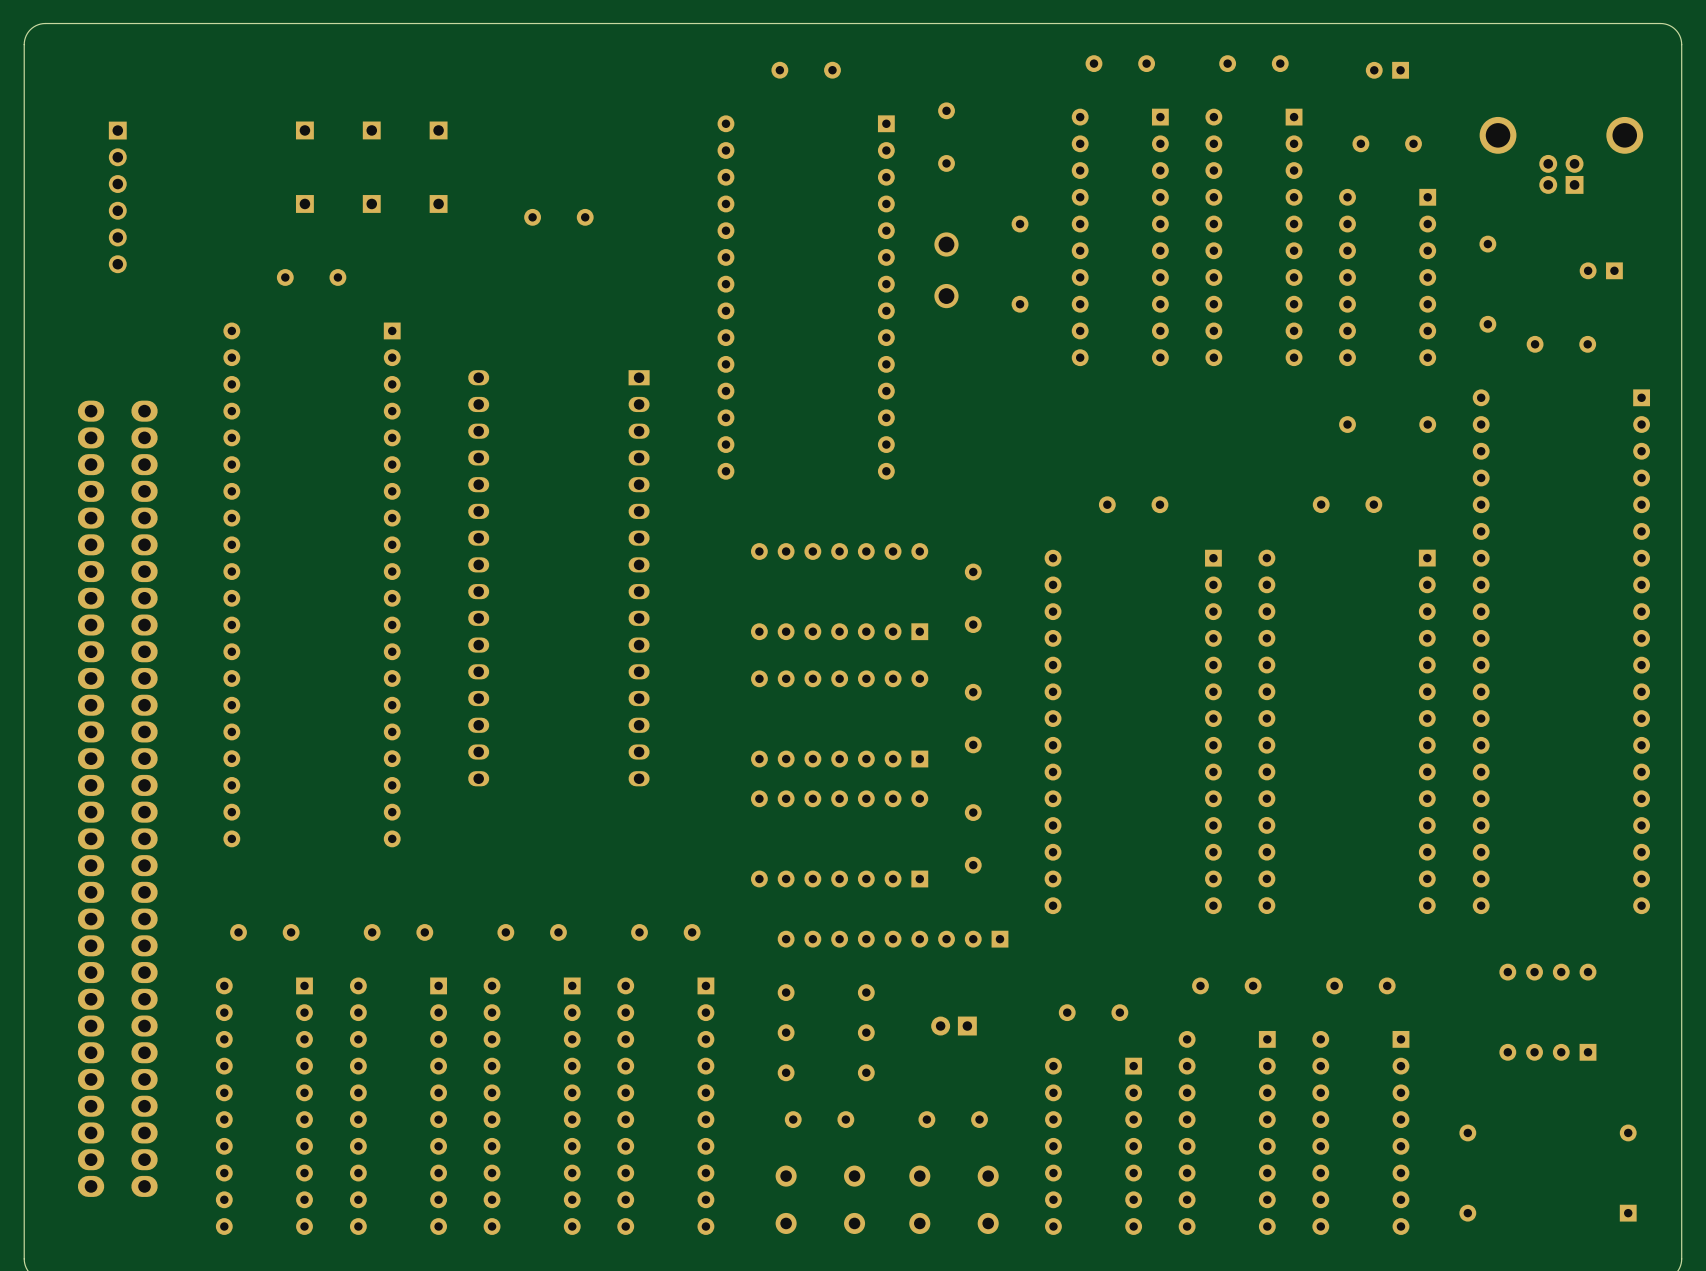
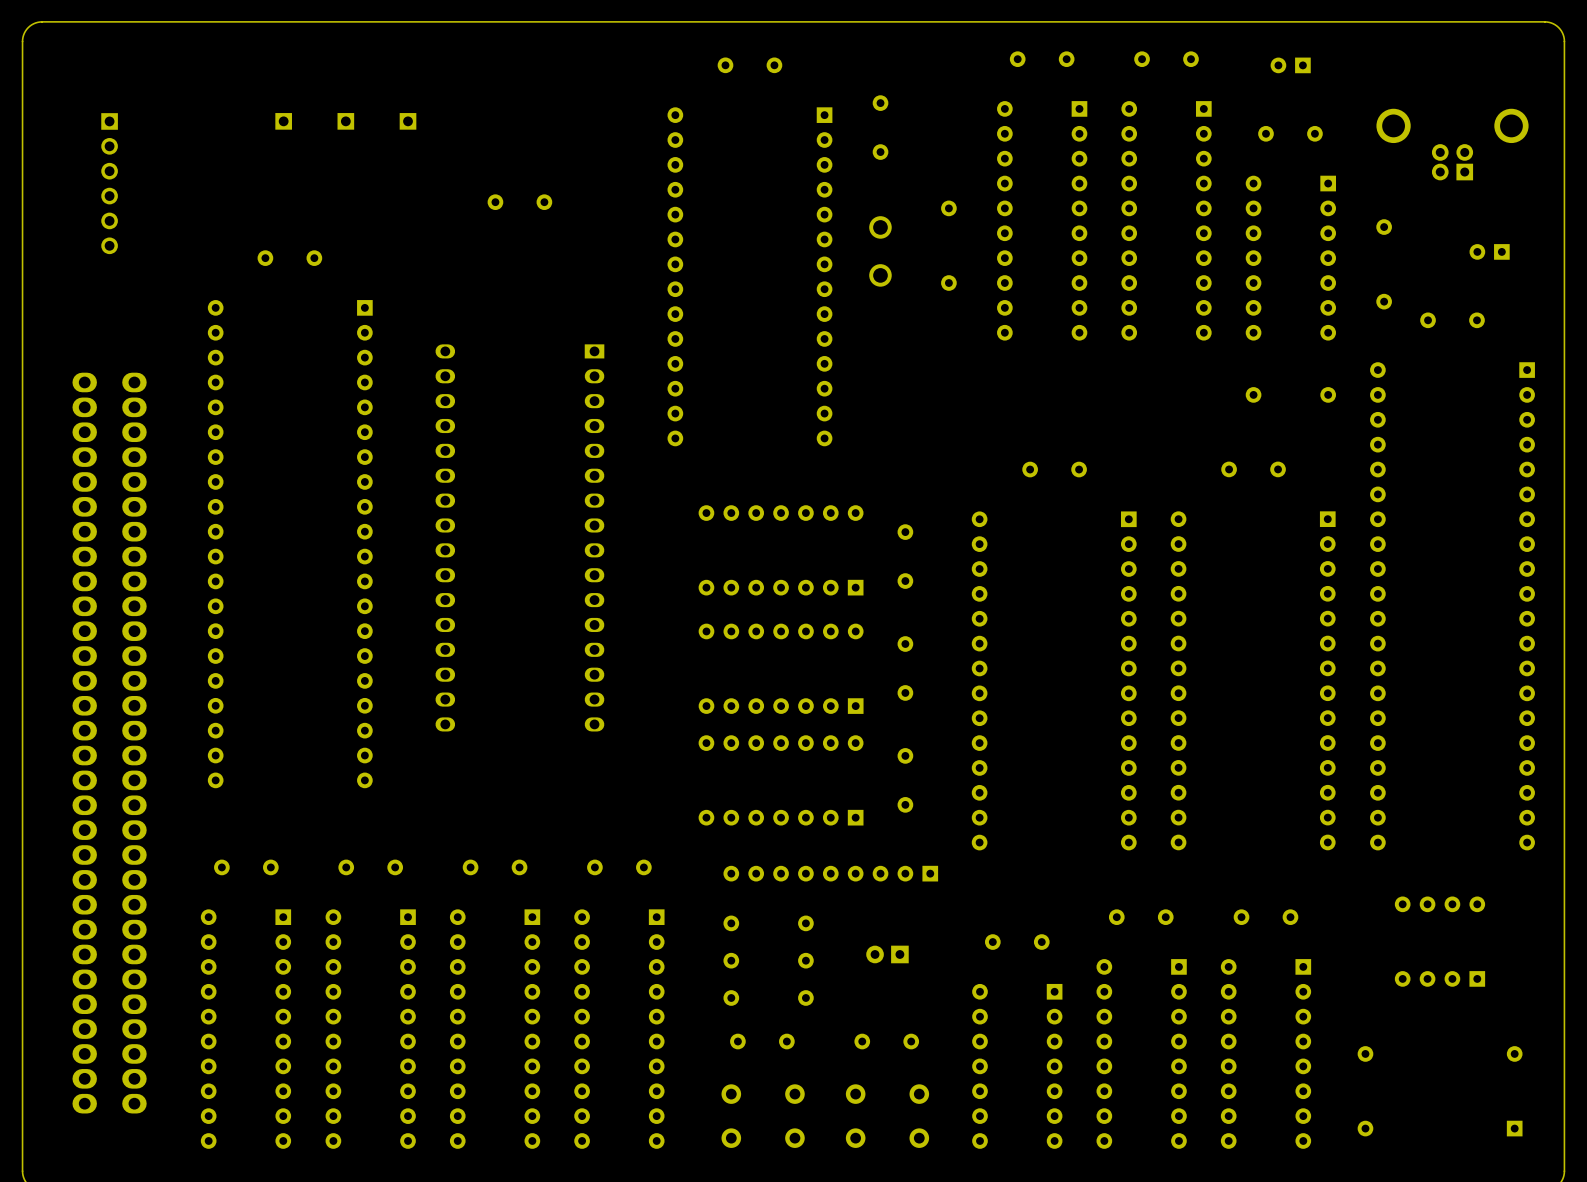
part: (304, 203) -> none
part: (371, 203) -> none
part: (438, 203) -> none

